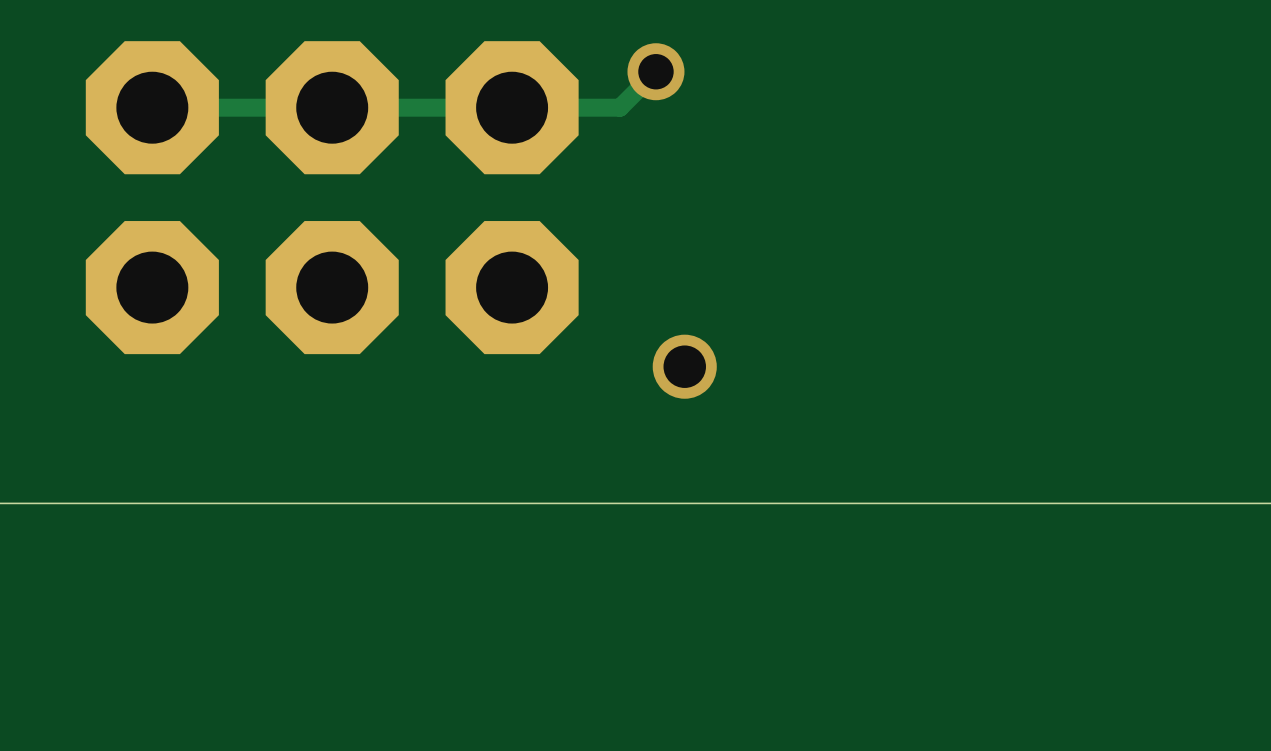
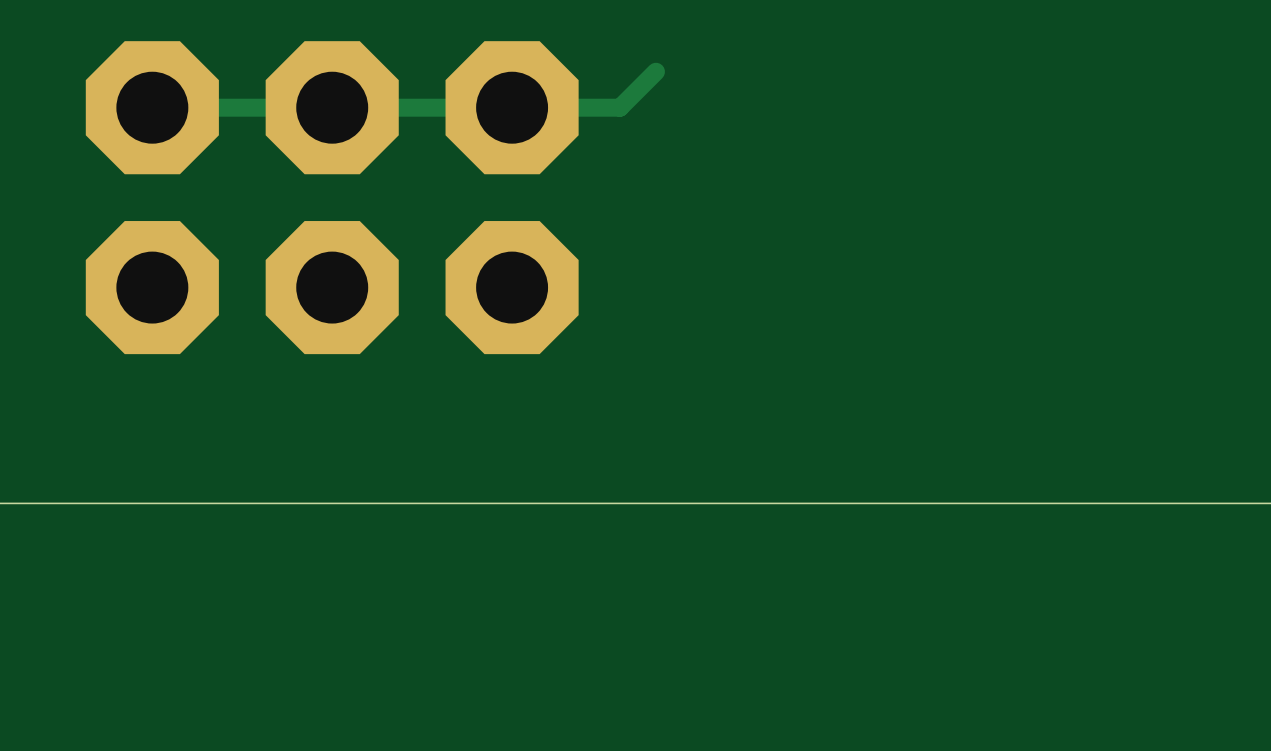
via: (655, 71) -> none
via: (684, 366) -> none

